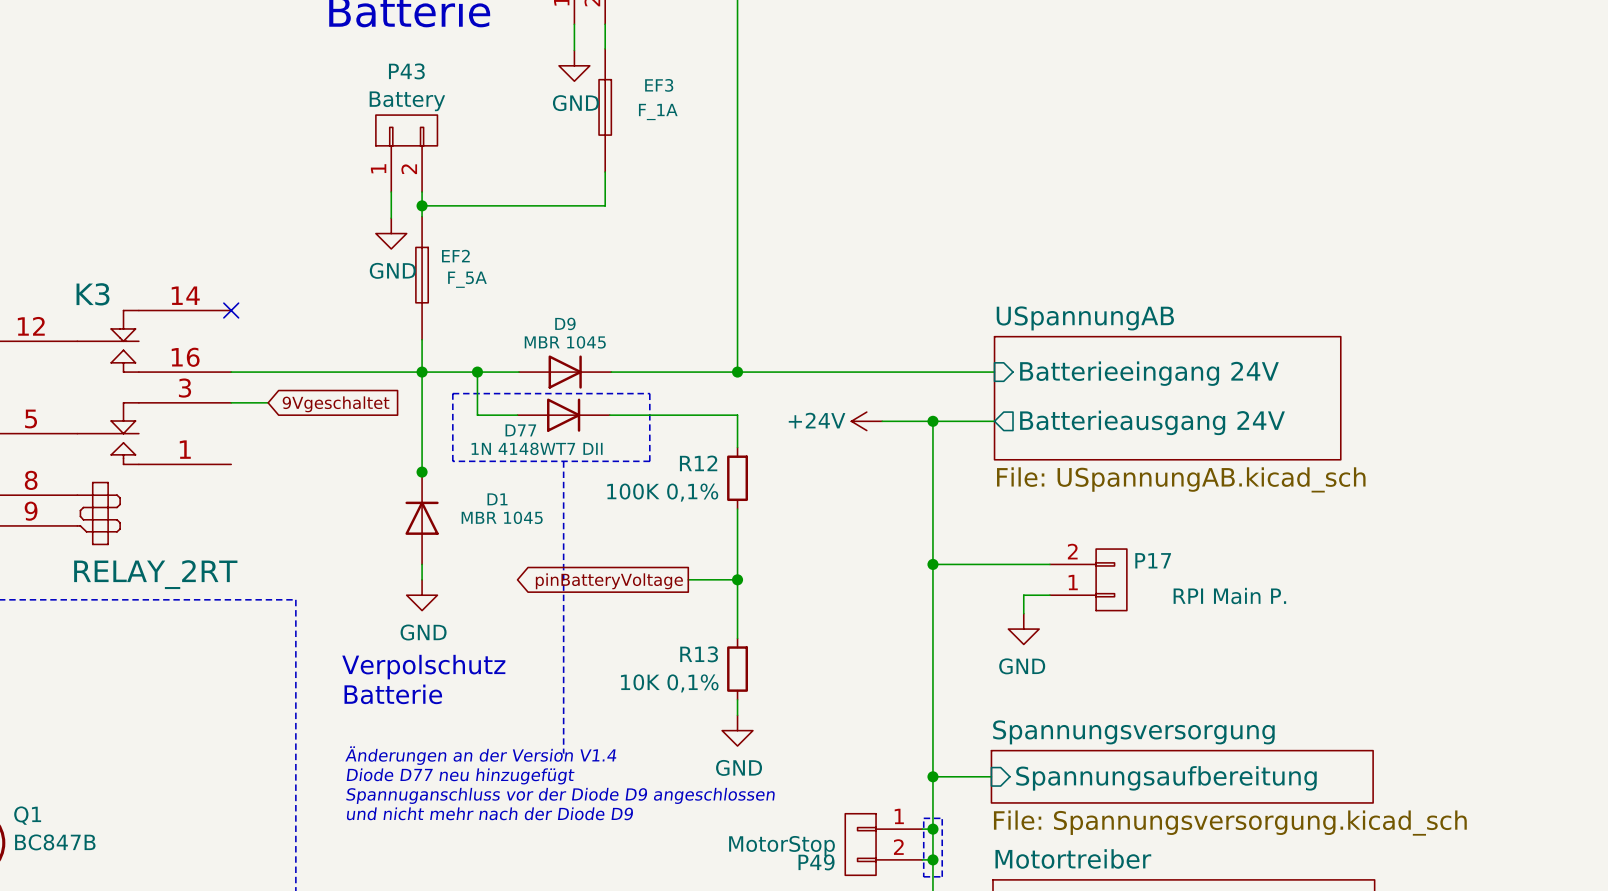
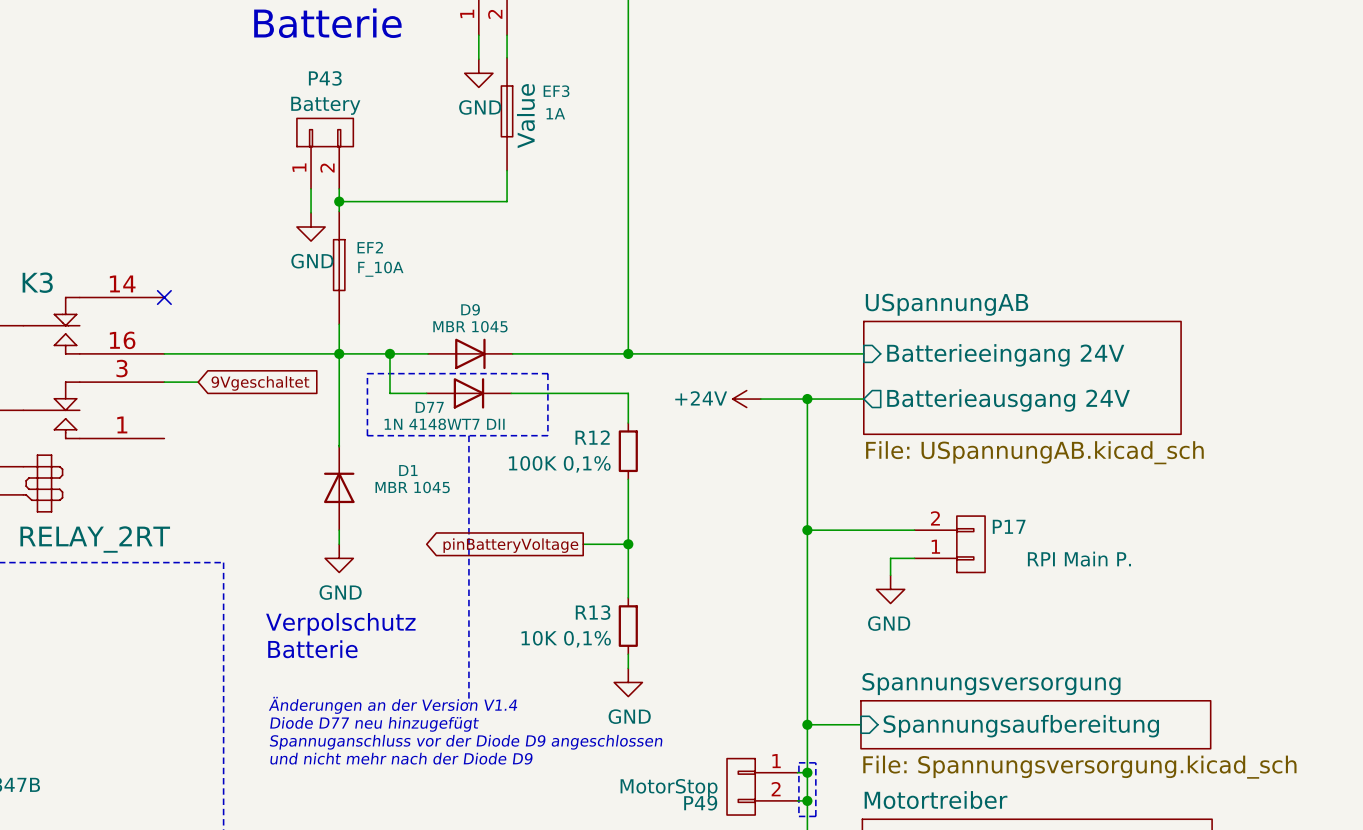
EF3 value: F_1A (658, 111) -> 1A (555, 113)
EF3 text: none -> Value (525, 116)
EF2 value: F_5A (467, 279) -> F_10A (380, 269)
junction: (422, 472) -> none

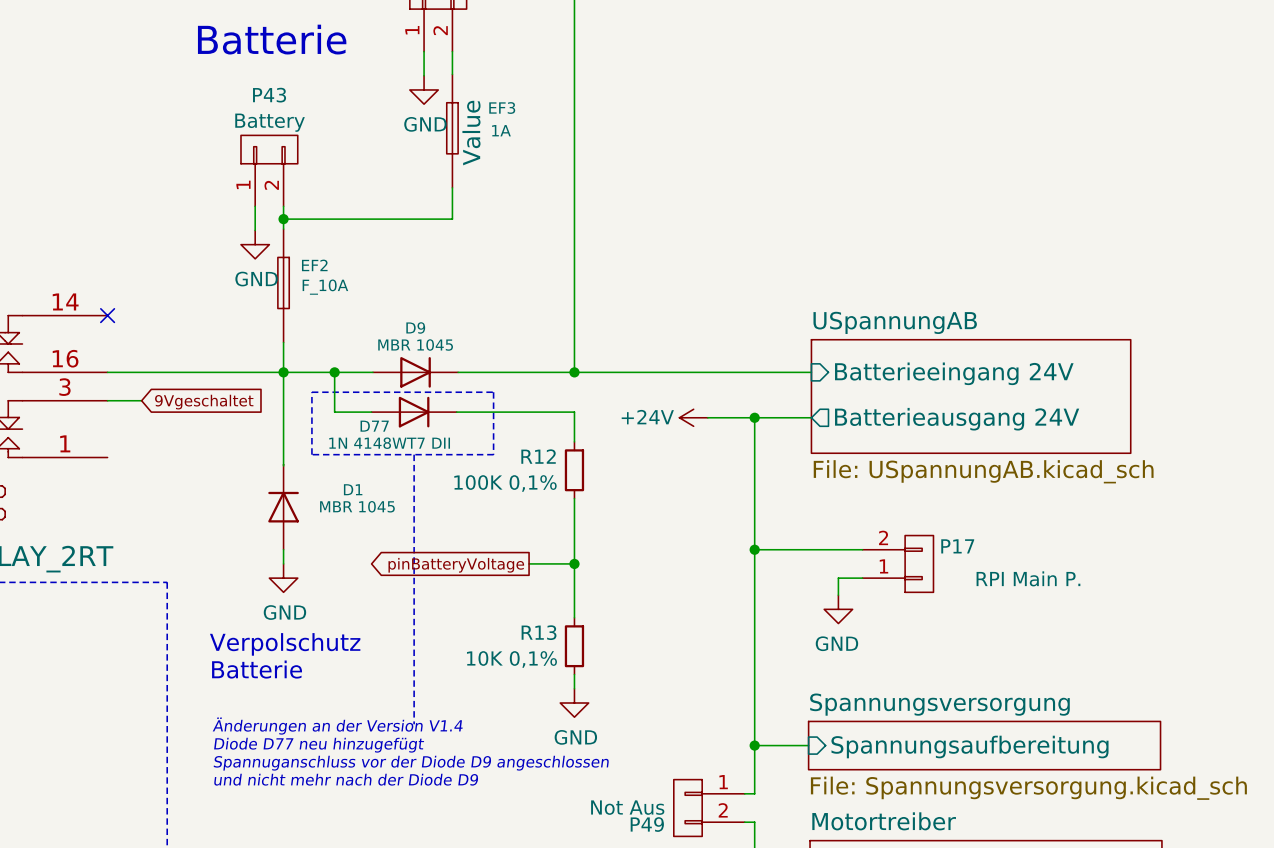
line: (798, 762) (815, 762) (815, 816) (798, 816) (798, 765) -> none
wire: (807, 772) (807, 800) -> none
junction: (807, 772) -> none
P49 value: MotorStop (669, 788) -> Not Aus (627, 807)
junction: (807, 800) -> none

